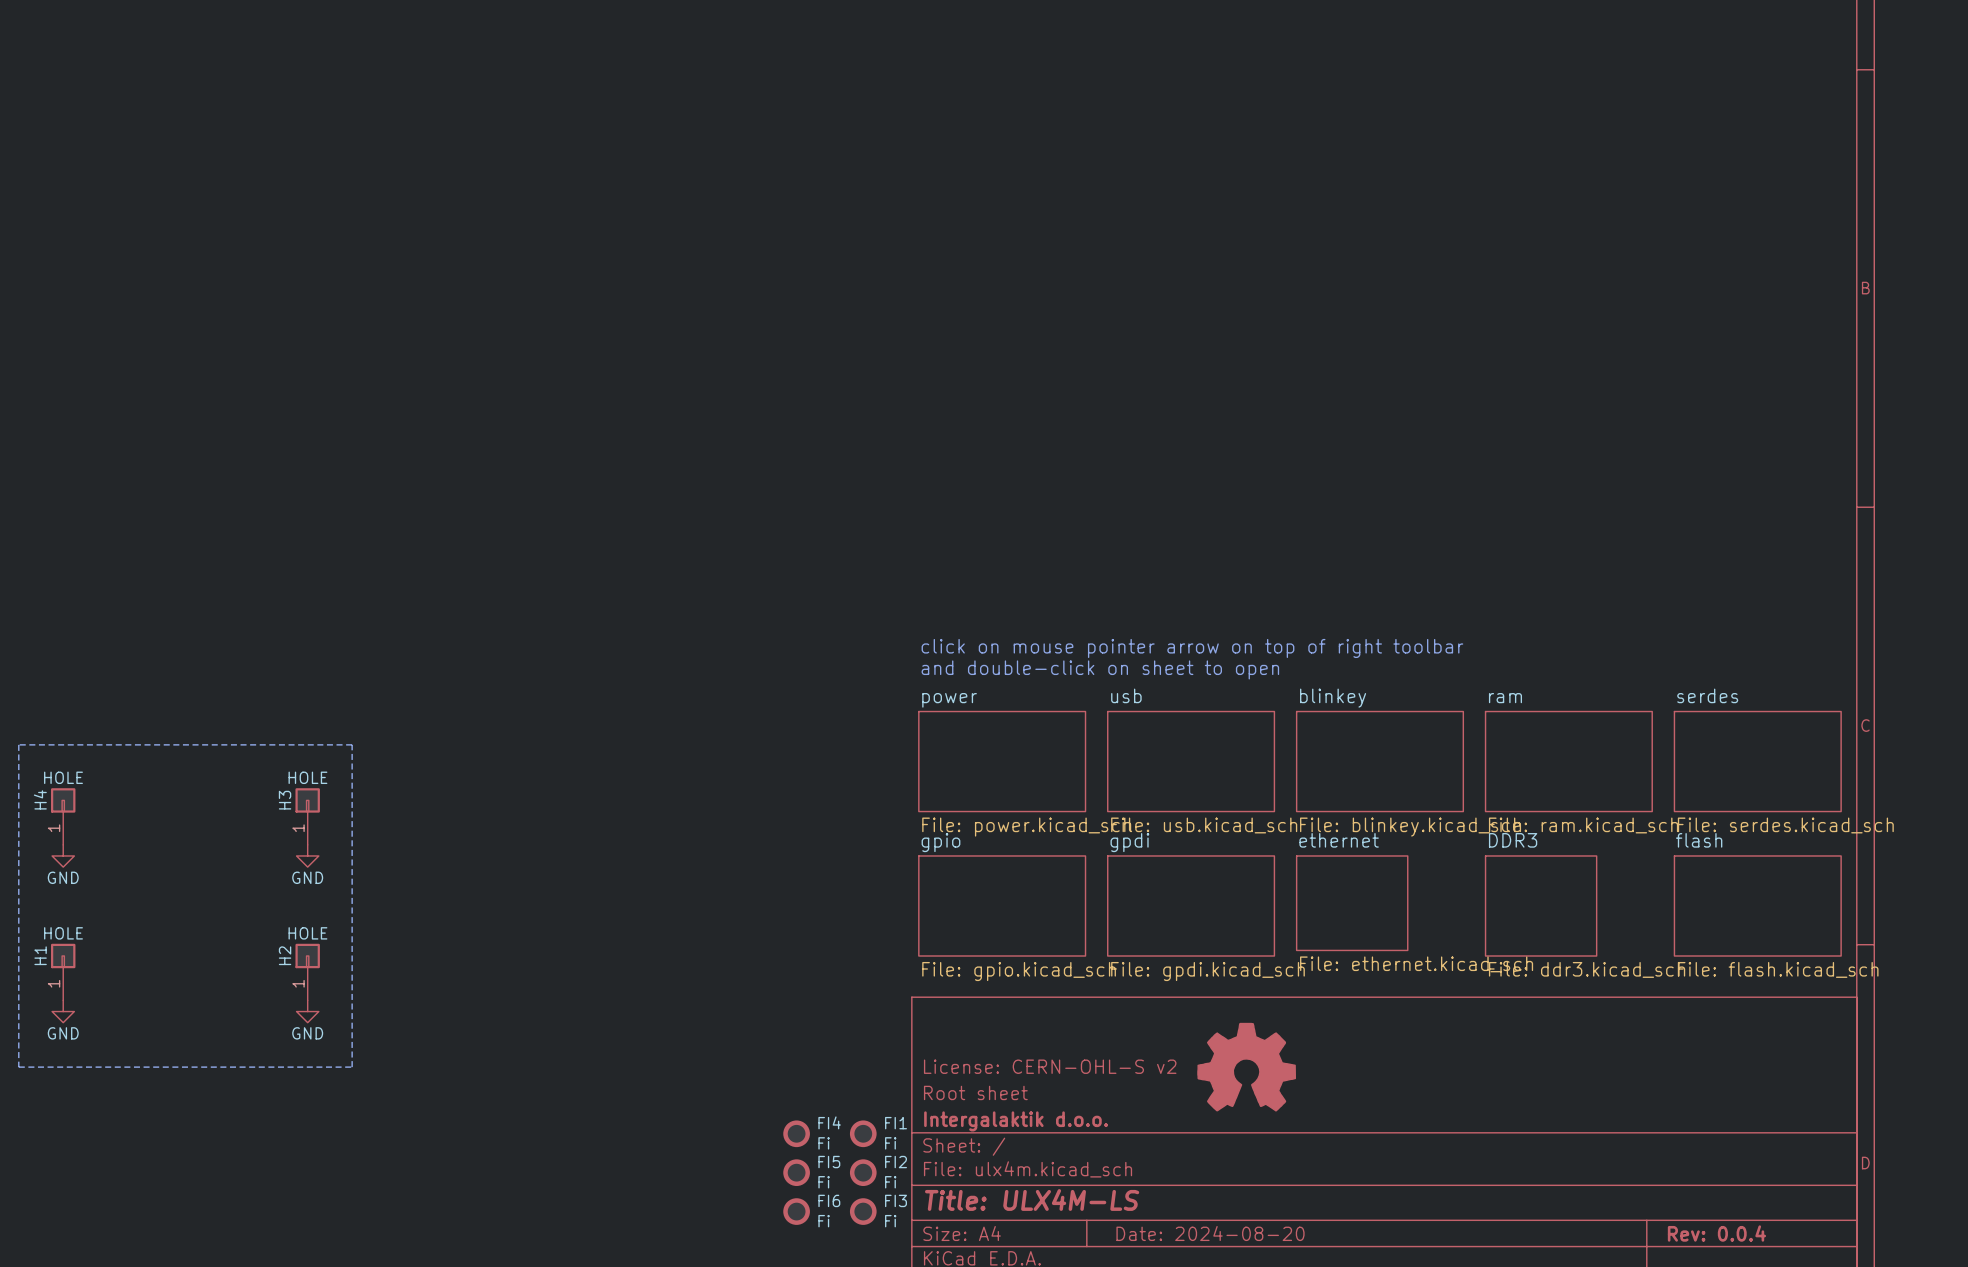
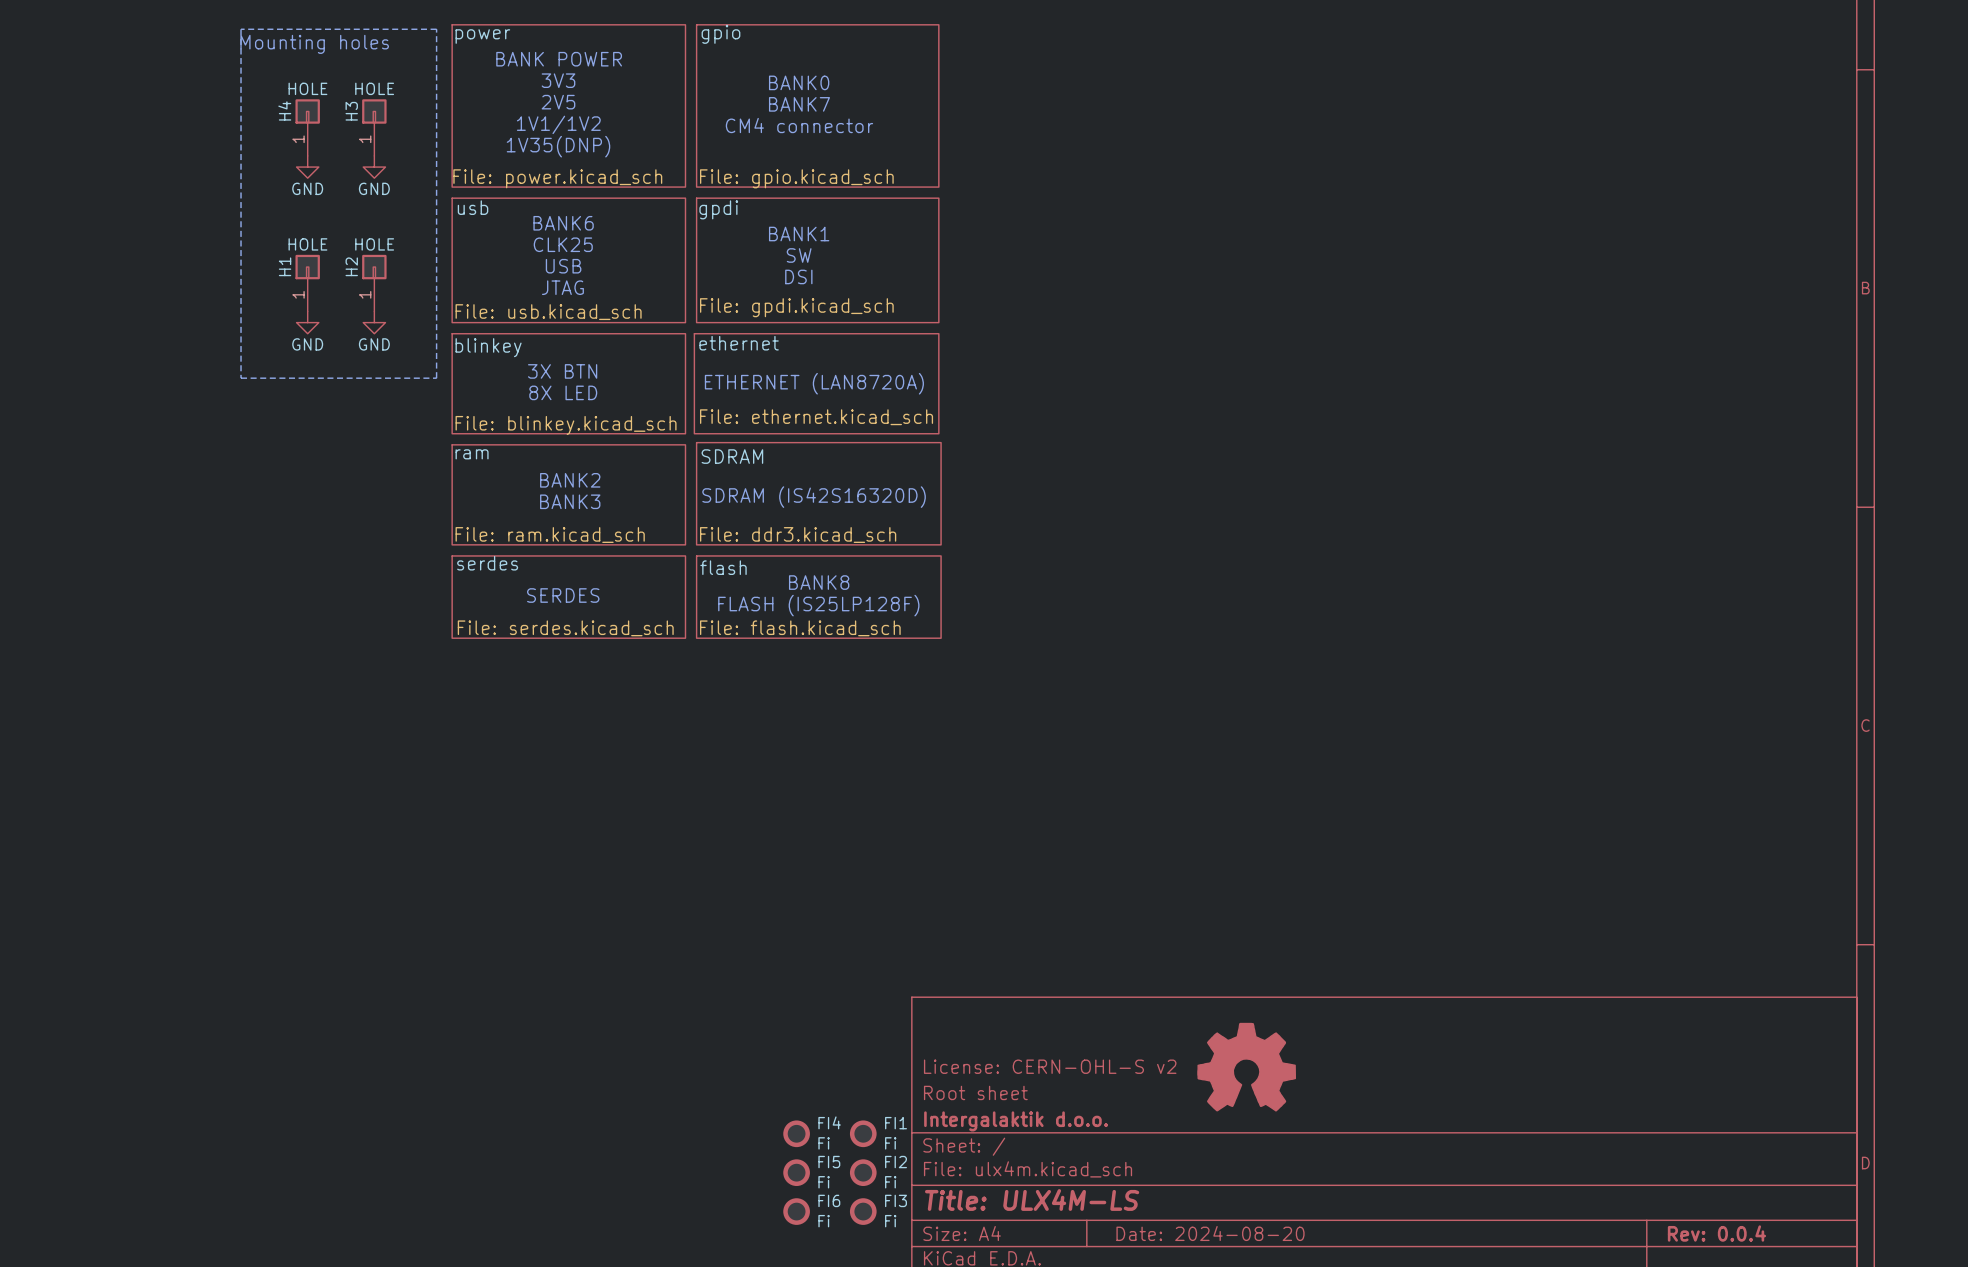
line: none -> (241, 29) (436, 29) (436, 378) (241, 378) (241, 29)
text: none -> Mounting holes (314, 44)
text: none -> BANK POWER (559, 59)
text: none -> 3V3 (558, 80)
text: none -> BANK0 (799, 82)
text: none -> 2V5 (558, 102)
text: none -> BANK7 (799, 104)
sheet power: none -> File: power.kicad_sch (568, 105)
sheet gpio: none -> File: gpio.kicad_sch (817, 105)
text: none -> 1V1/1V2 (558, 124)
text: none -> CM4 connector (799, 125)
text: none -> 1V35(DNP) (558, 146)
power symbol: none -> GND (307, 167)
power symbol: none -> GND (374, 167)
text: none -> BANK6 (563, 223)
text: none -> BANK1 (799, 234)
text: none -> CLK25 (563, 244)
text: none -> SW (799, 255)
sheet usb: none -> File: usb.kicad_sch (568, 260)
sheet gpdi: none -> File: gpdi.kicad_sch (817, 260)
text: none -> USB (563, 266)
text: none -> DSI (798, 276)
text: none -> JTAG (562, 287)
power symbol: none -> GND (307, 322)
power symbol: none -> GND (374, 322)
text: none -> 3X BTN (562, 371)
sheet blinkey: none -> File: blinkey.kicad_sch (568, 383)
text: none -> ETHERNET (LAN8720A) (814, 383)
sheet ethernet: none -> File: ethernet.kicad_sch (816, 383)
text: none -> 8X LED (563, 392)
text: none -> BANK2 (570, 480)
sheet SDRAM: none -> File: ddr3.kicad_sch (818, 493)
sheet ram: none -> File: ram.kicad_sch (568, 494)
text: none -> SDRAM (IS42S16320D) (814, 497)
text: none -> BANK3 (570, 501)
text: none -> BANK8 (819, 582)
text: none -> SERDES (563, 595)
sheet serdes: none -> File: serdes.kicad_sch (568, 597)
sheet flash: none -> File: flash.kicad_sch (818, 597)
text: none -> FLASH (IS25LP128F) (818, 605)
text: click on mouse pointer arrow on top of right toolbar (1192, 648) -> none
text: and double-click on sheet to open (1100, 669) -> none
line: (18, 744) (352, 744) (352, 1067) (18, 1067) (18, 744) -> none
sheet power: File: power.kicad_sch (1002, 761) -> none
sheet usb: File: usb.kicad_sch (1191, 761) -> none
sheet blinkey: File: blinkey.kicad_sch (1379, 761) -> none
sheet ram: File: ram.kicad_sch (1568, 761) -> none
sheet serdes: File: serdes.kicad_sch (1757, 761) -> none
H4 position: (63, 816) -> (307, 127)
H3 position: (307, 816) -> (374, 127)
power symbol: GND (63, 855) -> none
power symbol: GND (307, 855) -> none
sheet ethernet: File: ethernet.kicad_sch (1352, 903) -> none
sheet gpio: File: gpio.kicad_sch (1002, 905) -> none
sheet gpdi: File: gpdi.kicad_sch (1191, 905) -> none
sheet DDR3: File: ddr3.kicad_sch (1541, 905) -> none
sheet flash: File: flash.kicad_sch (1757, 905) -> none
H1 position: (63, 972) -> (307, 283)
H2 position: (307, 972) -> (374, 283)
power symbol: GND (63, 1011) -> none
power symbol: GND (307, 1011) -> none

